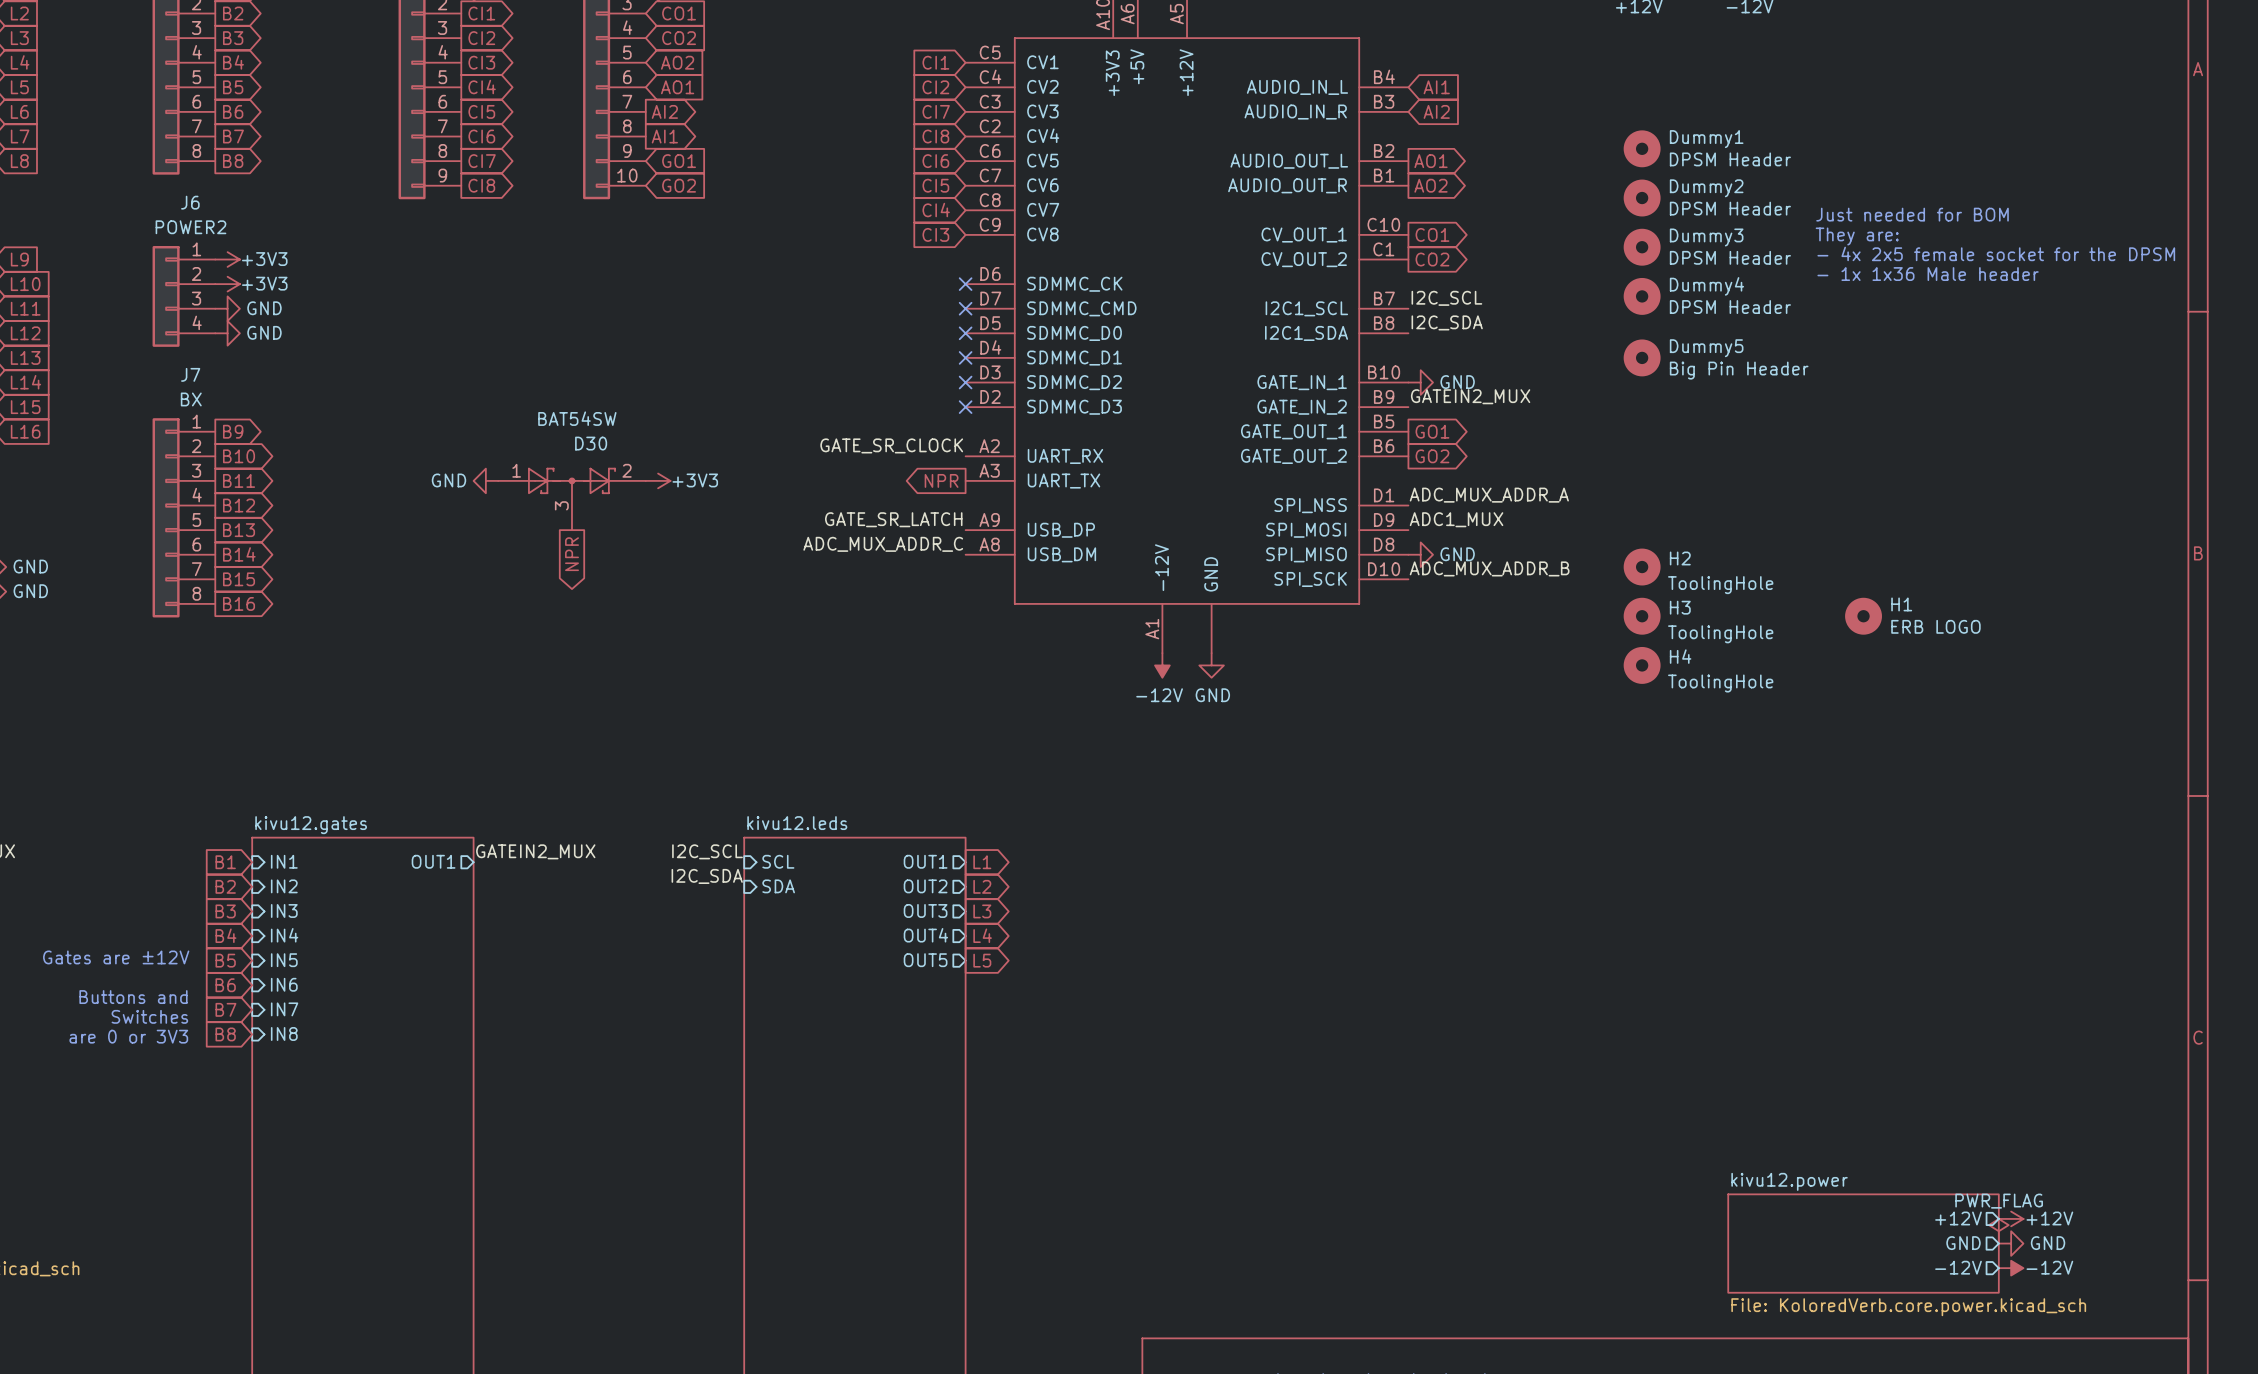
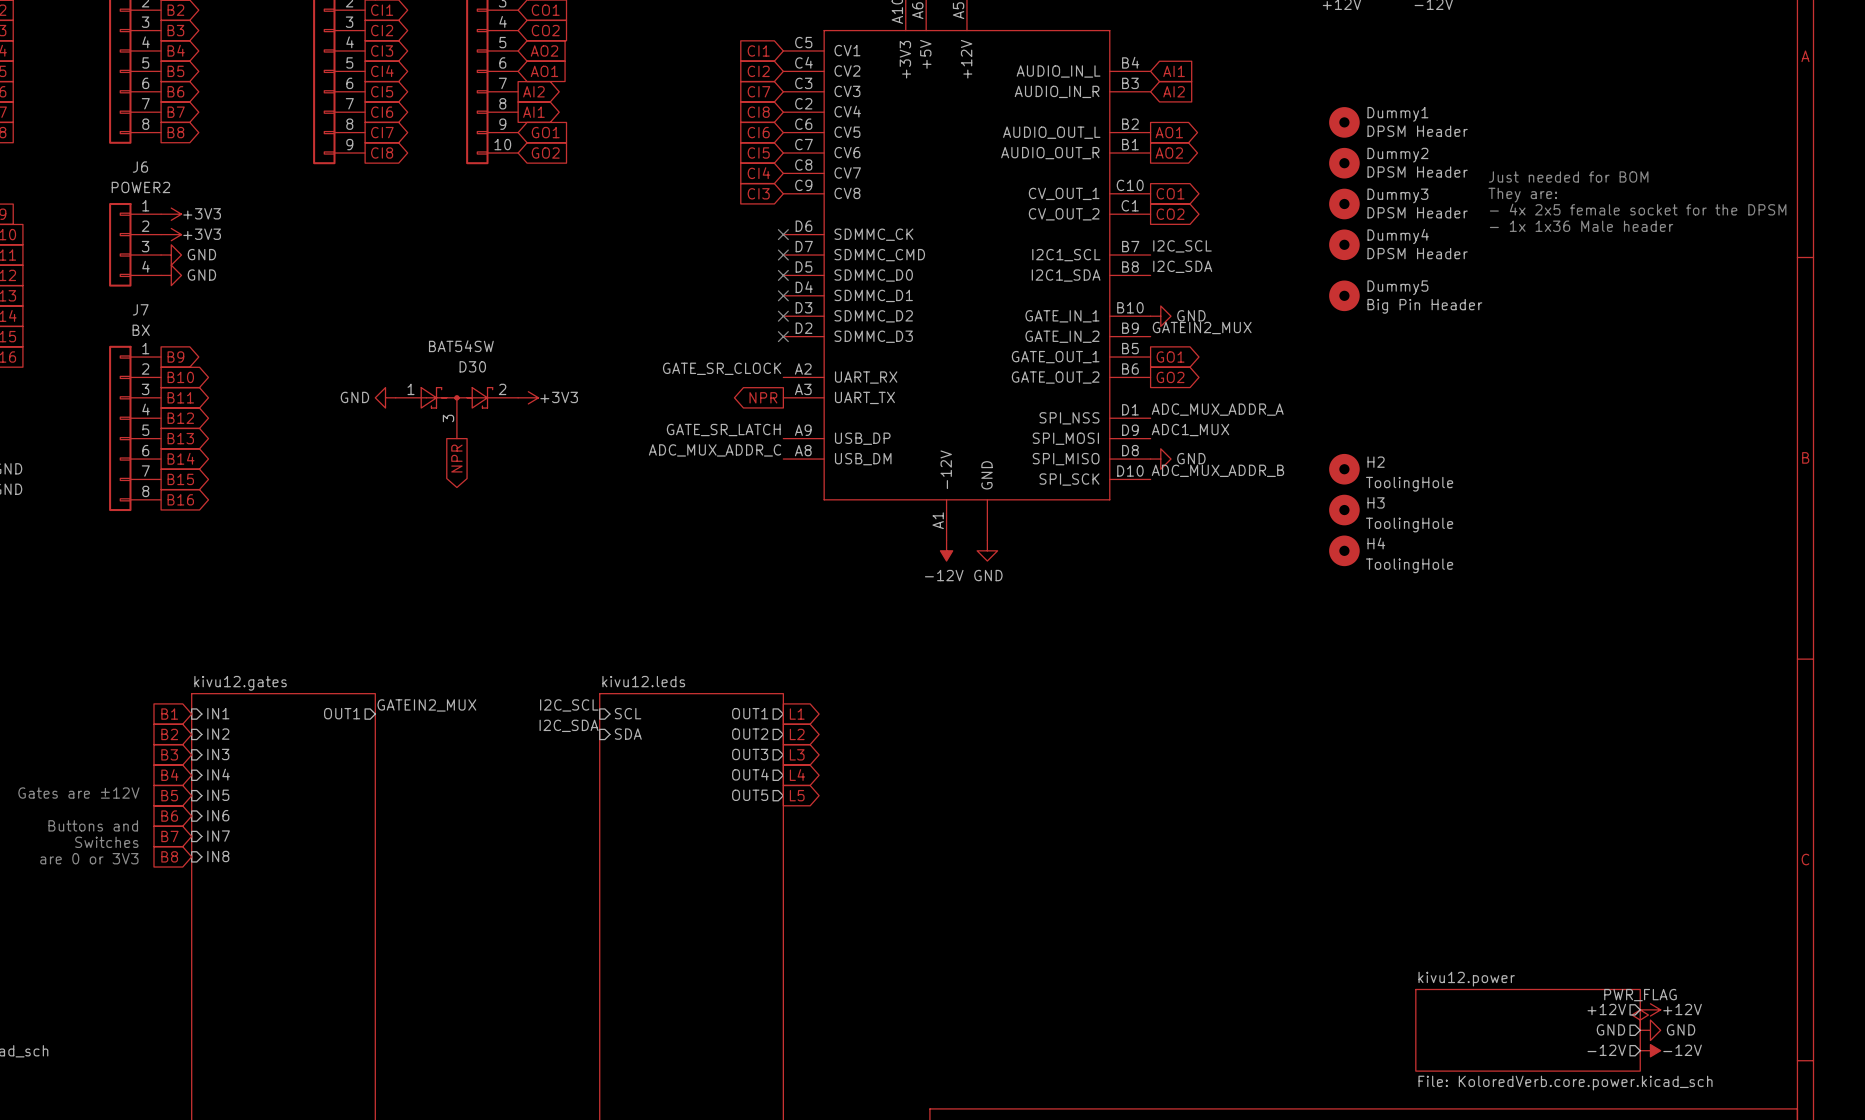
H1: ERB LOGO (1863, 616) -> none

